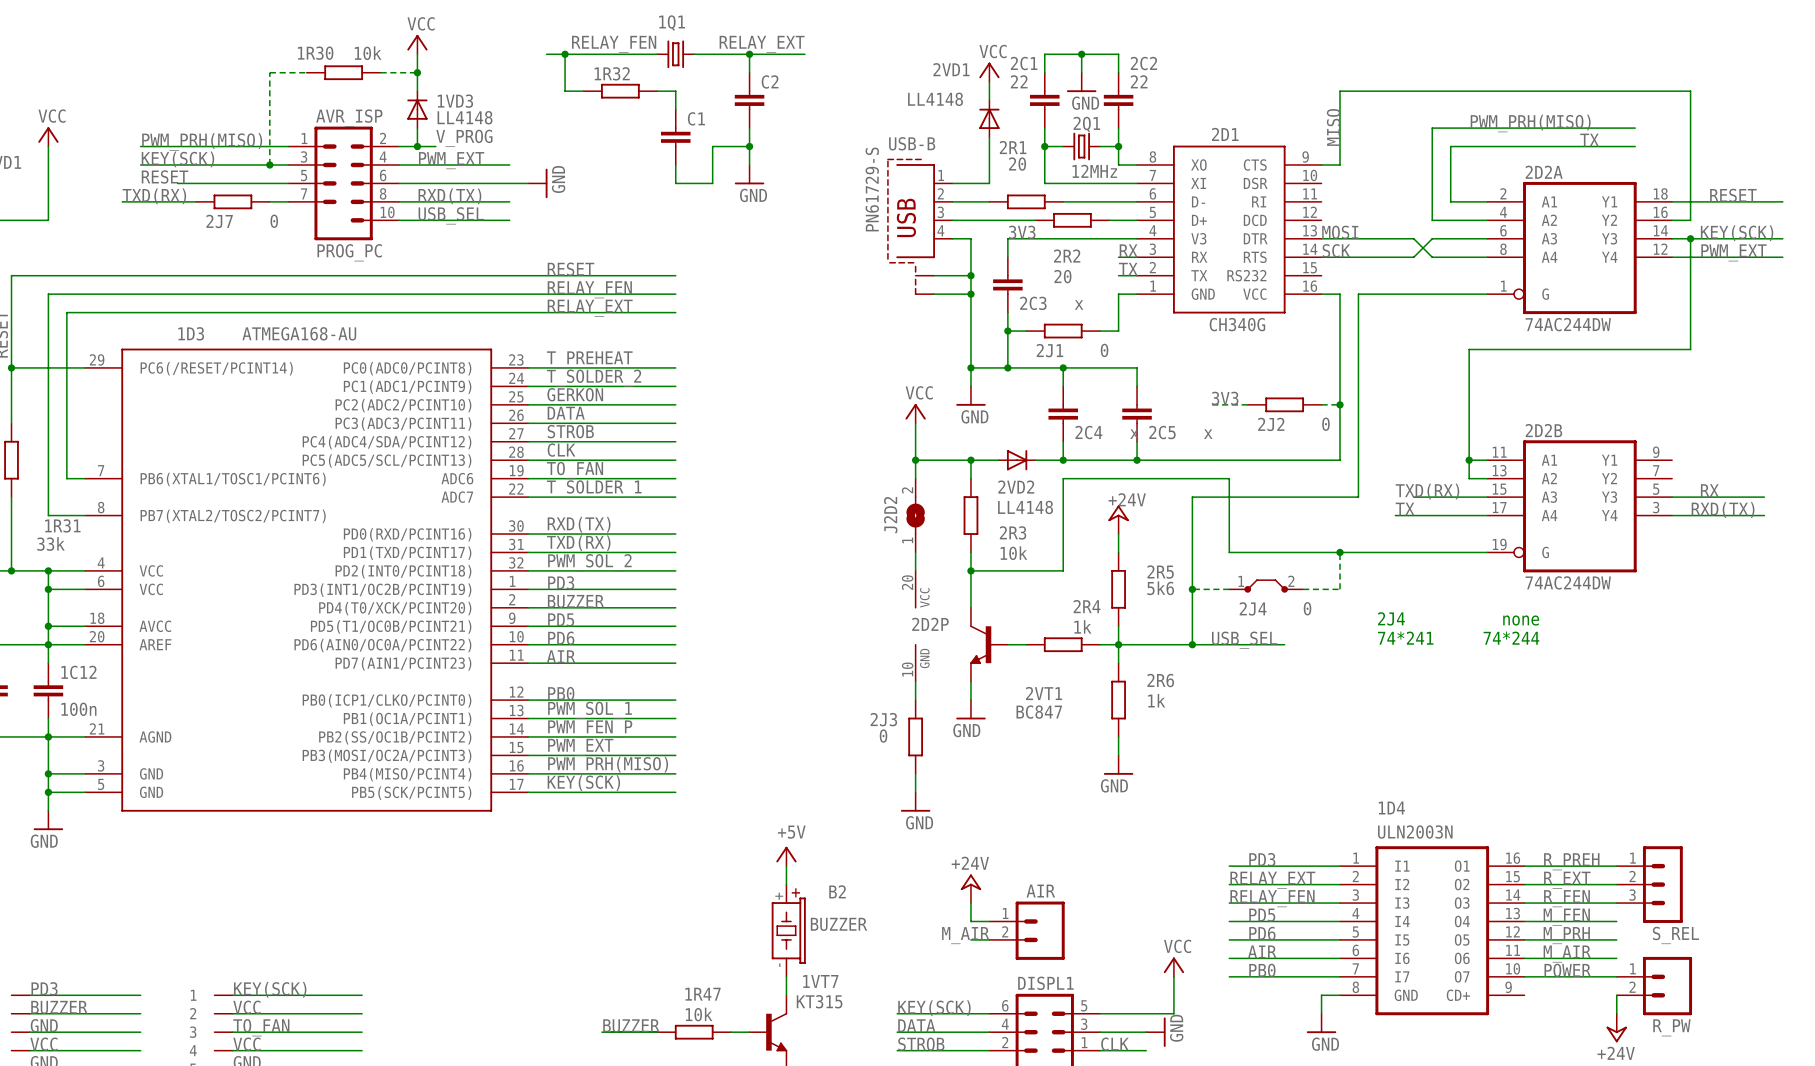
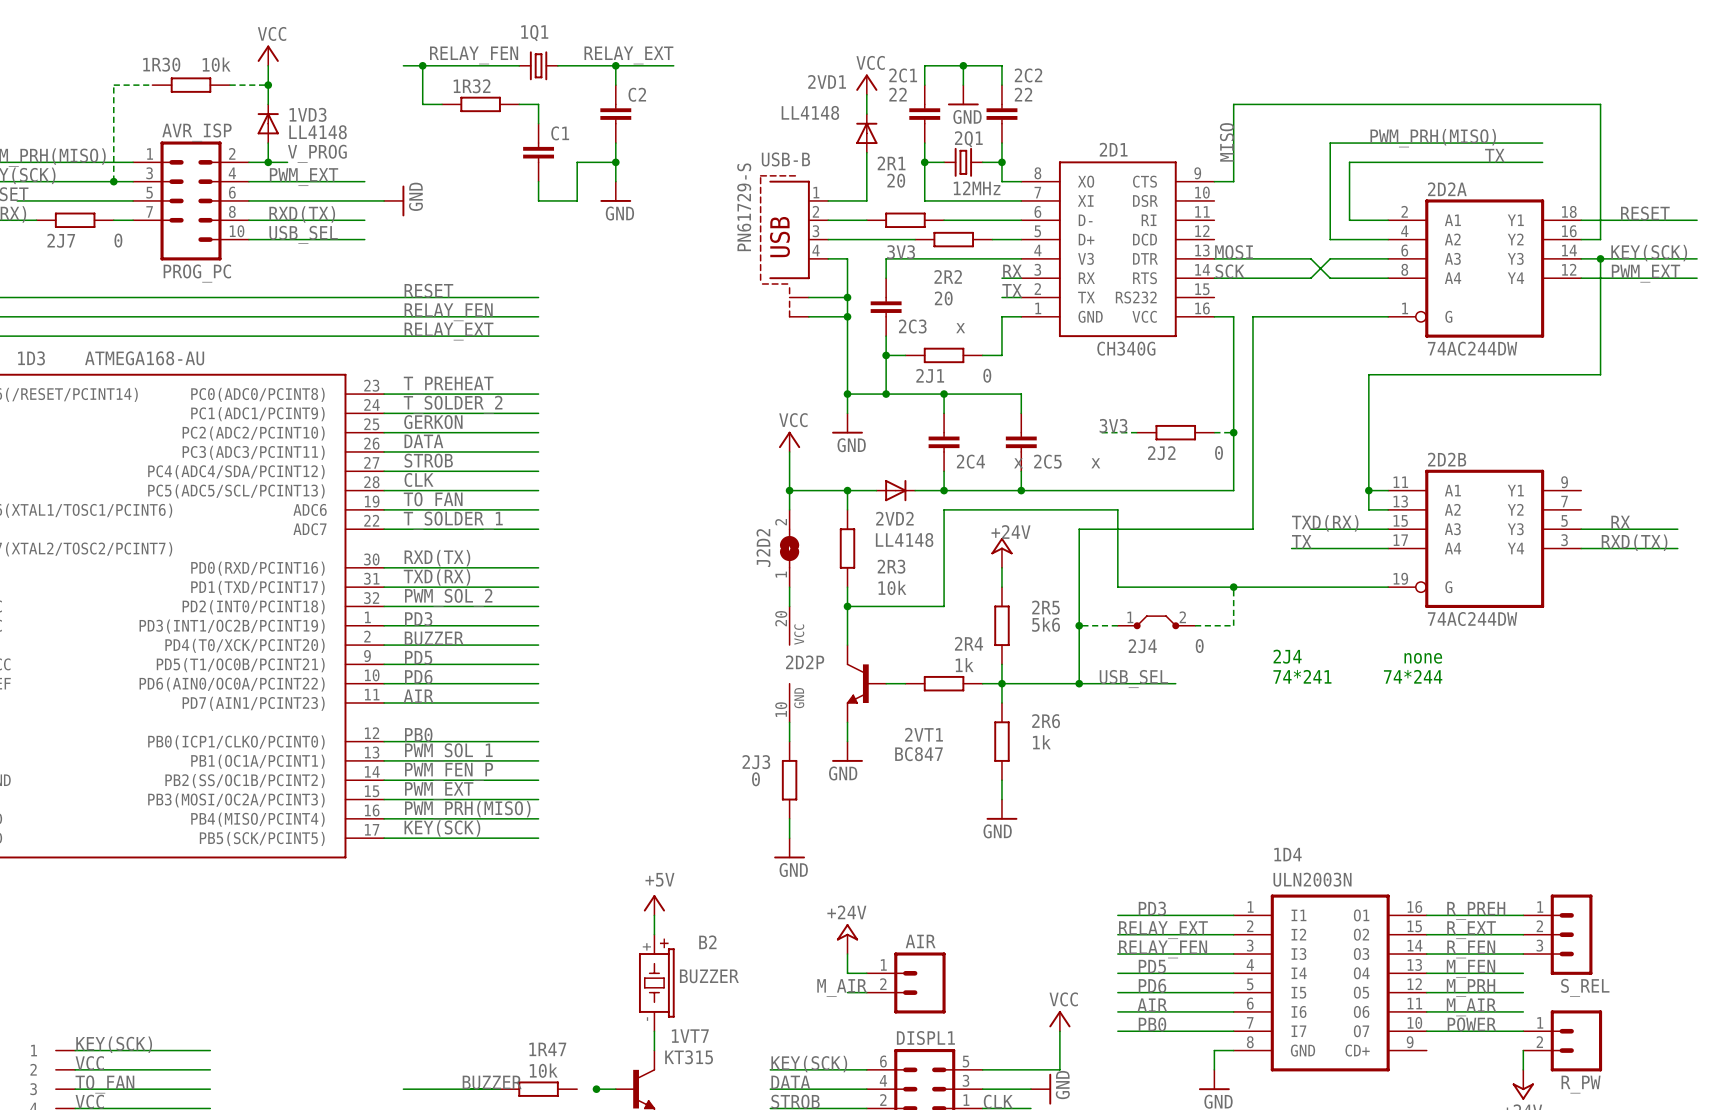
wire: none -> (403, 1089) (461, 1089)
1R47 position: (694, 1032) -> (538, 1089)
junction: none -> (596, 1089)

